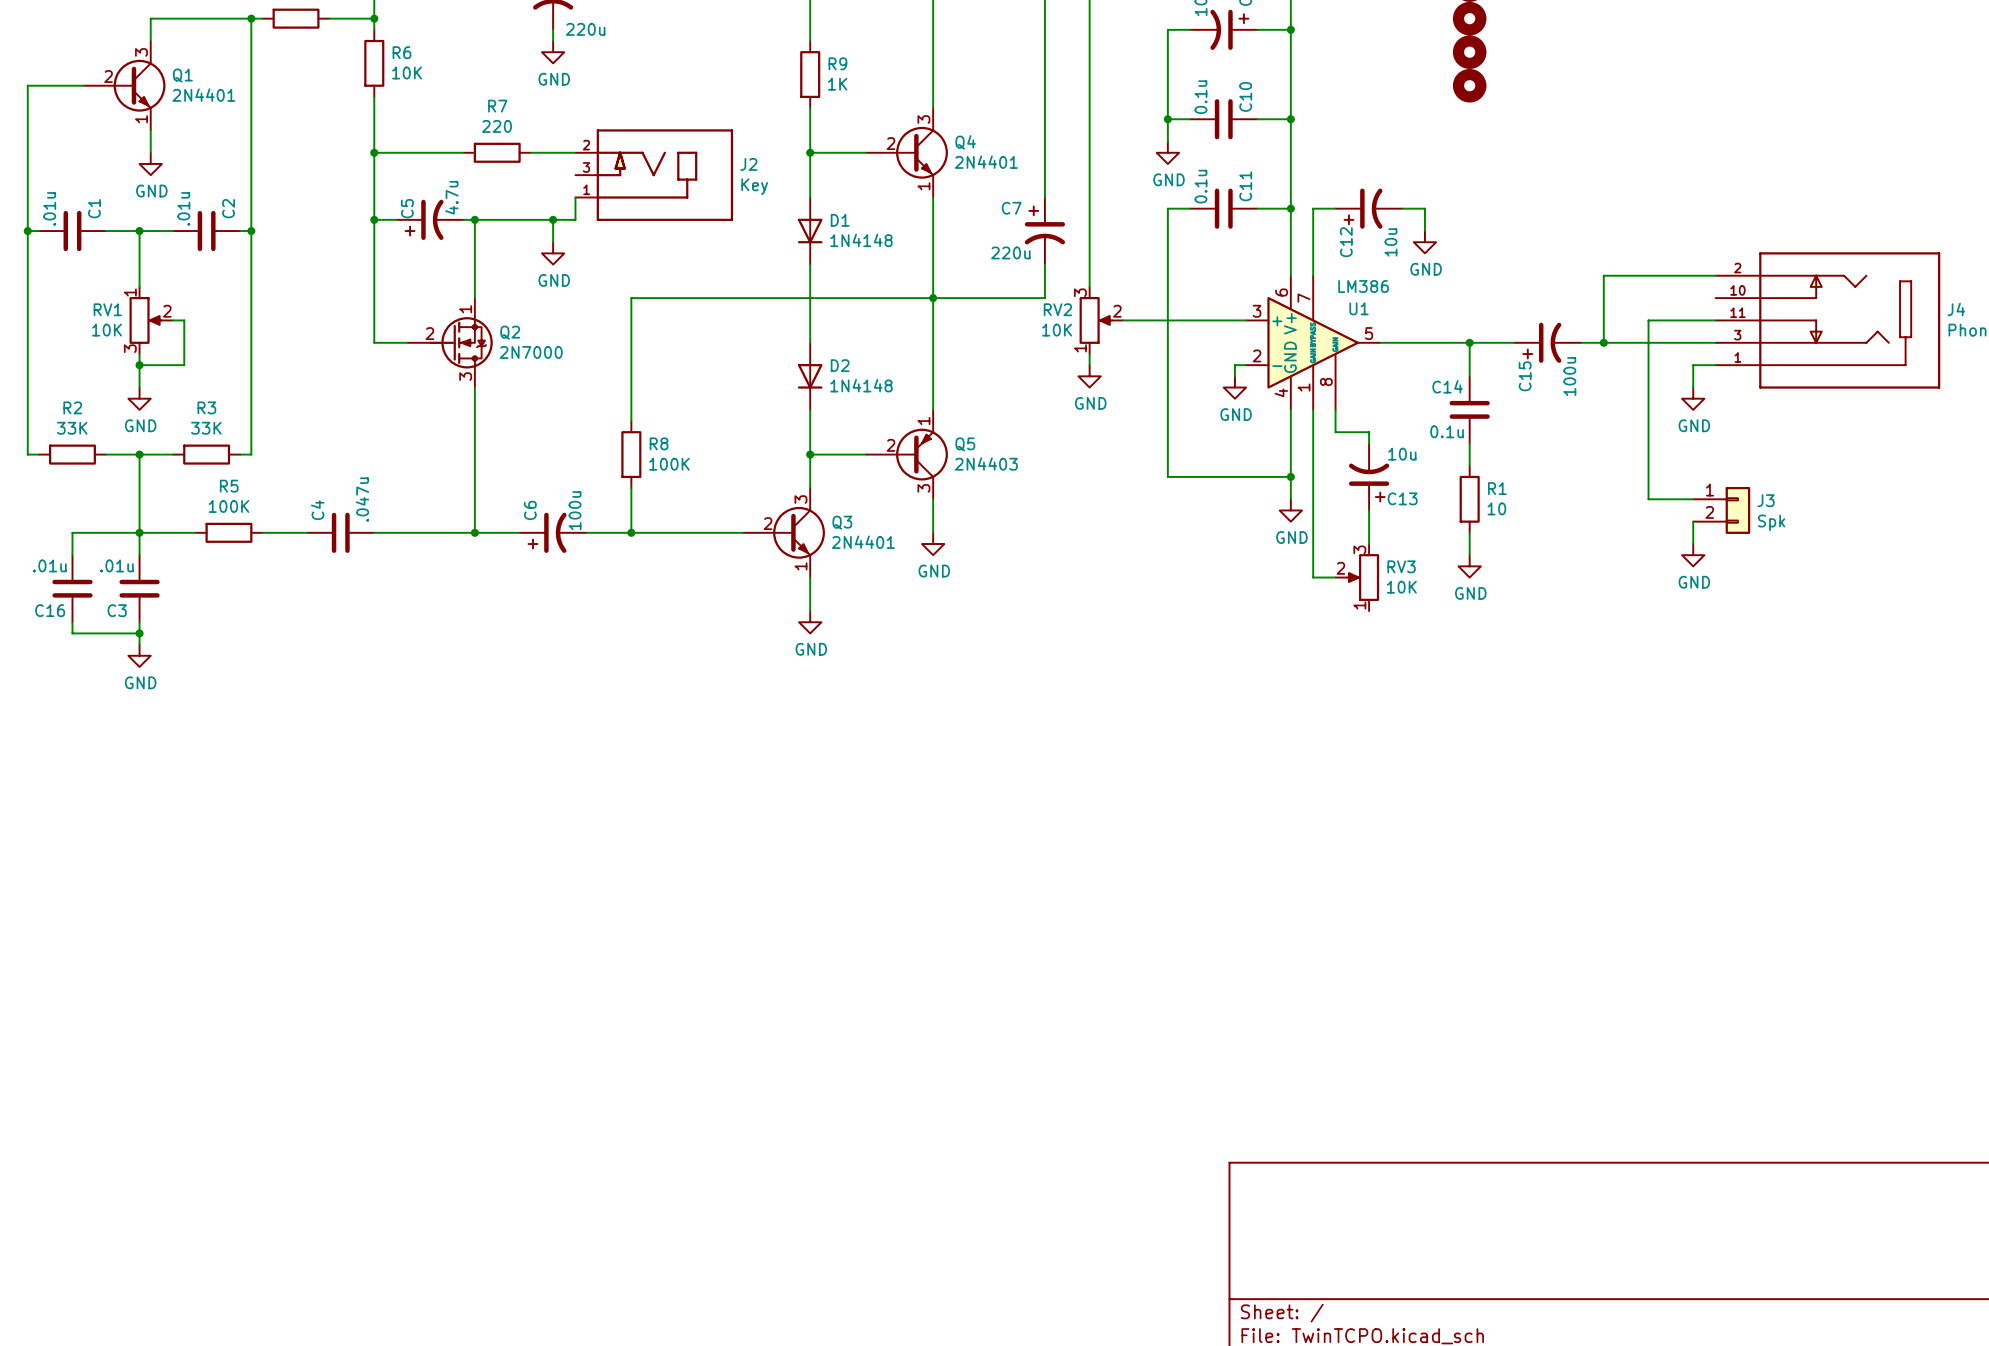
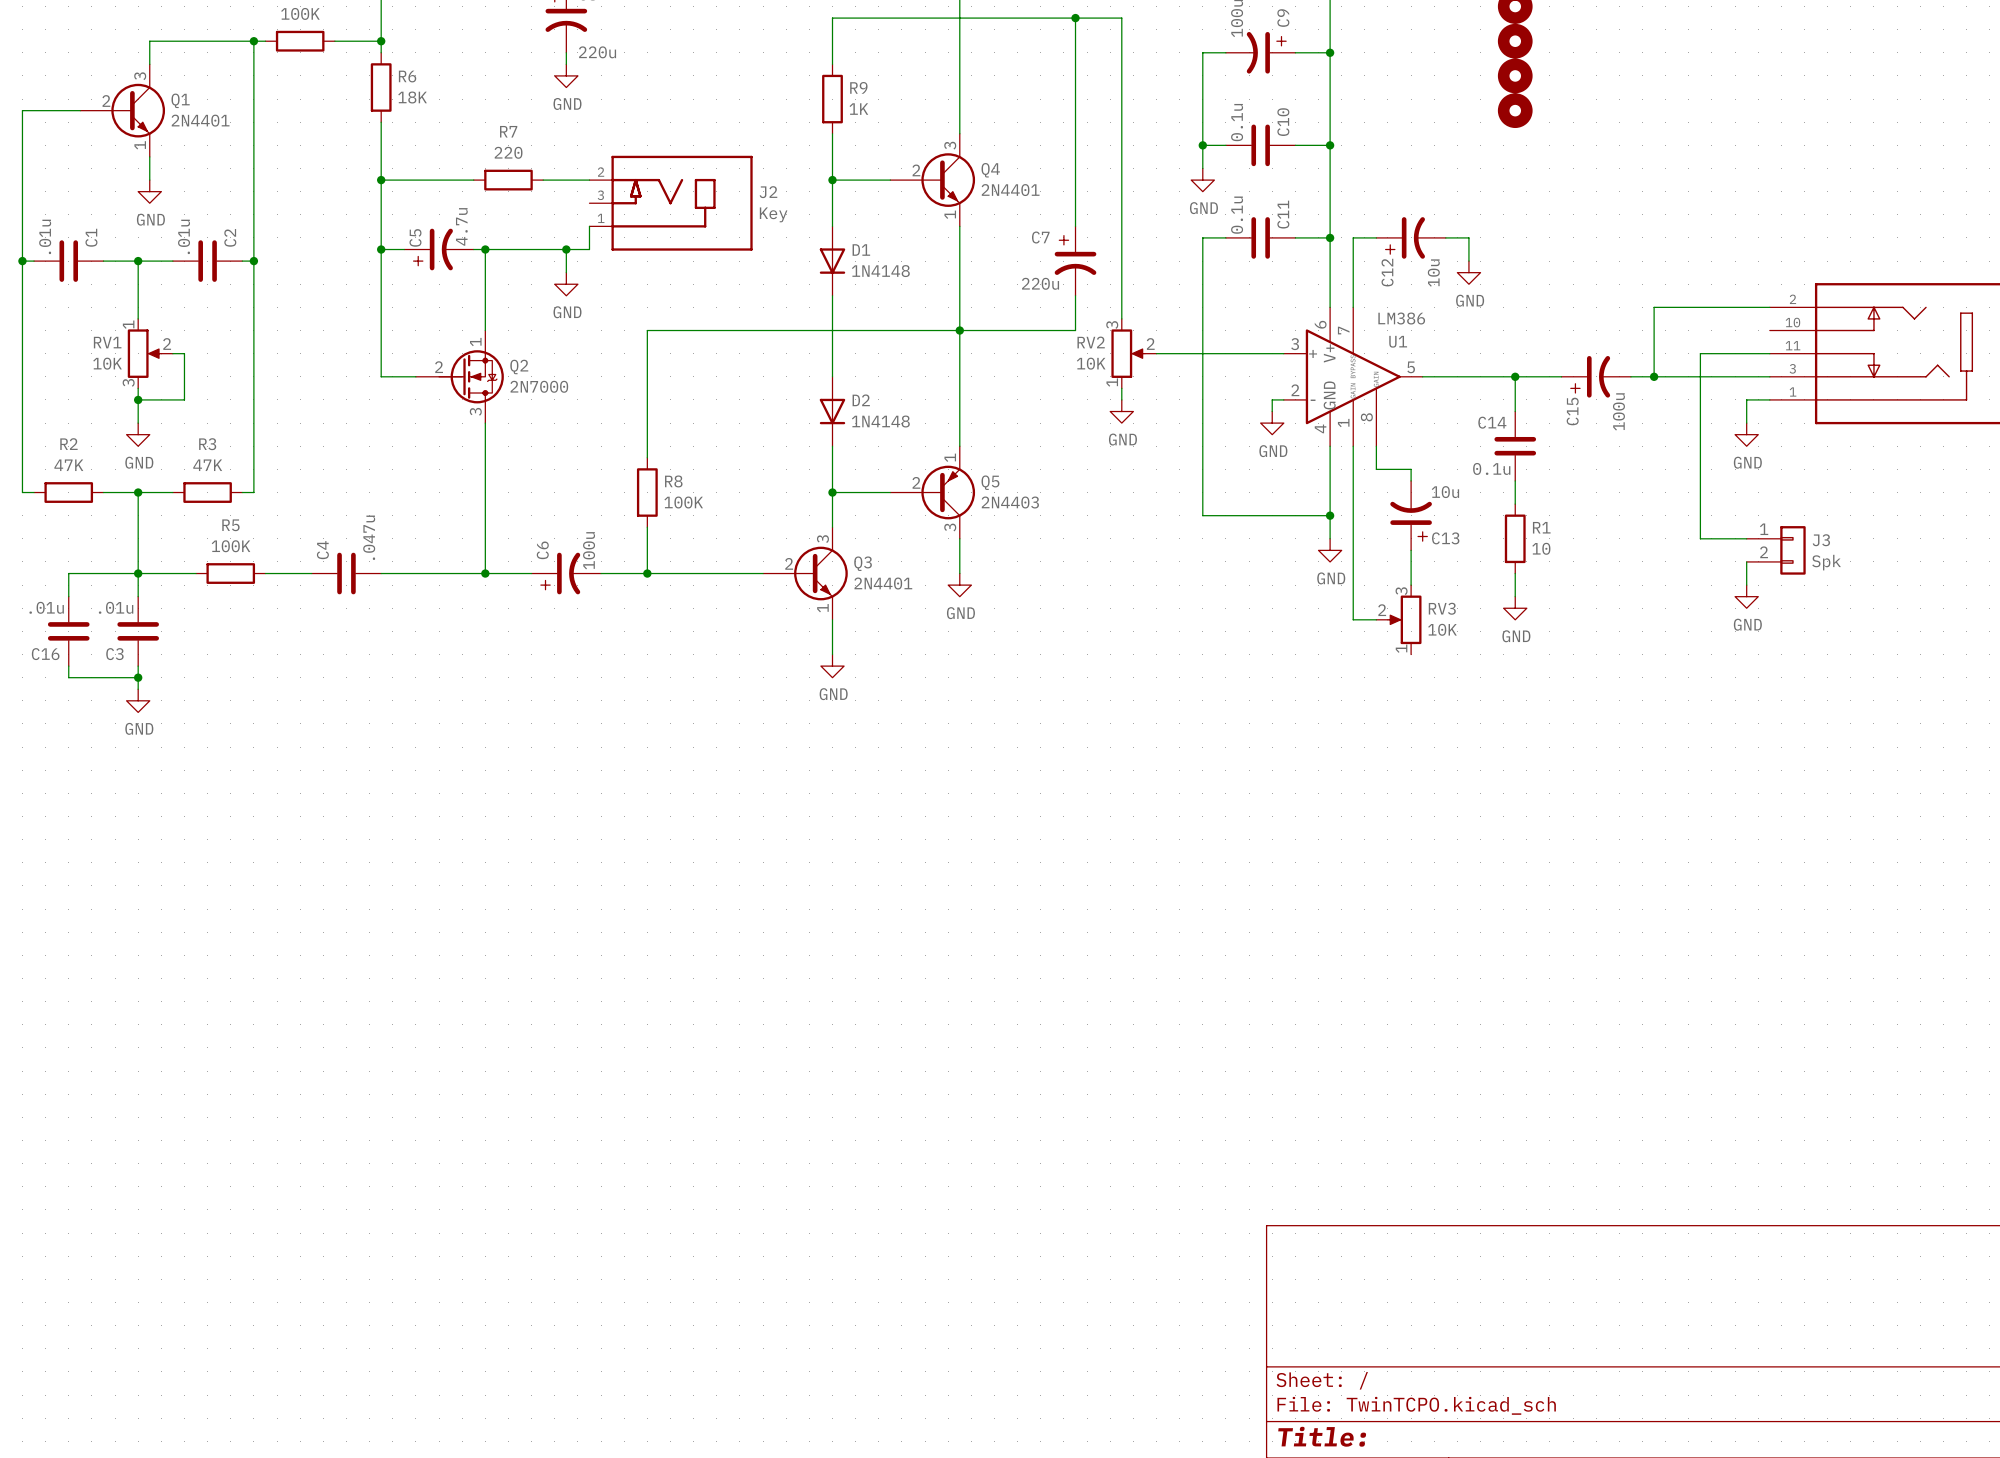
R6 value: 10K (407, 73) -> 18K (412, 97)
R2 value: 33K (72, 428) -> 47K (68, 465)
R3 value: 33K (206, 428) -> 47K (207, 465)

